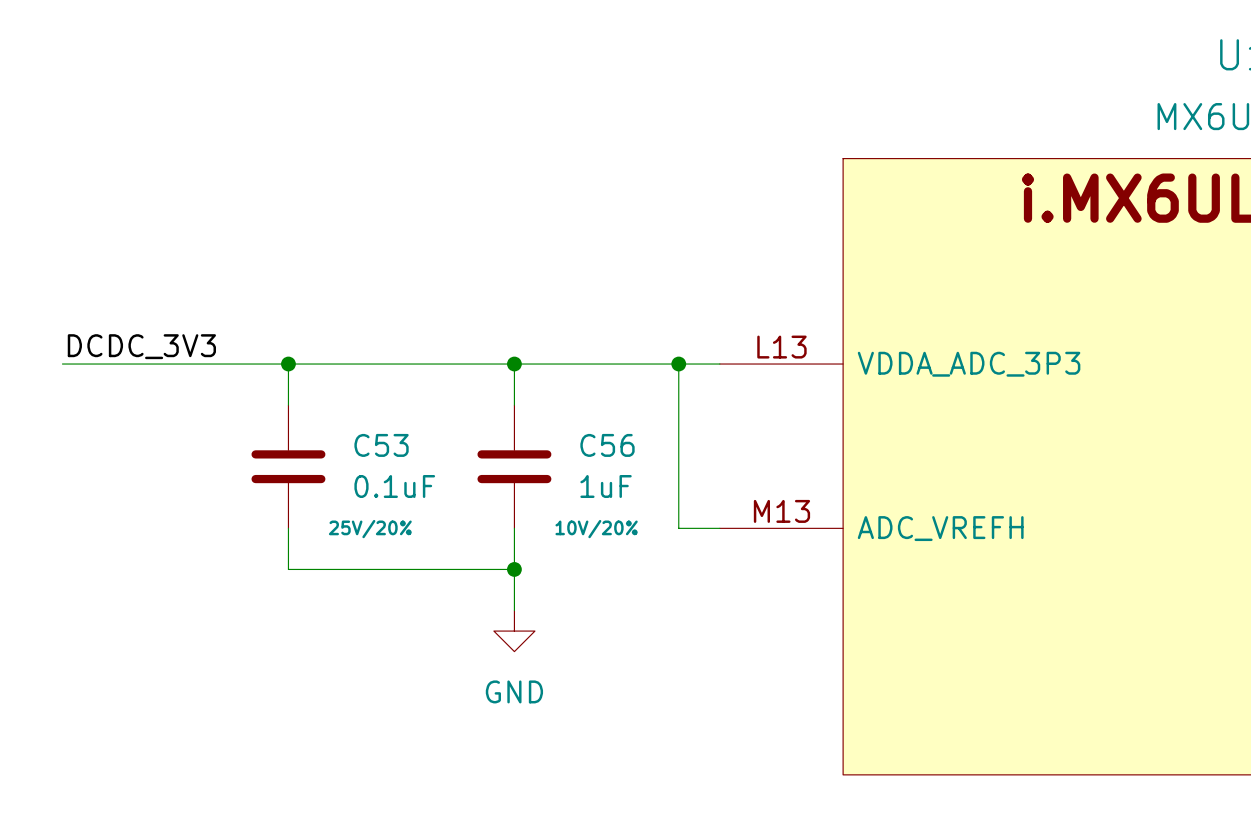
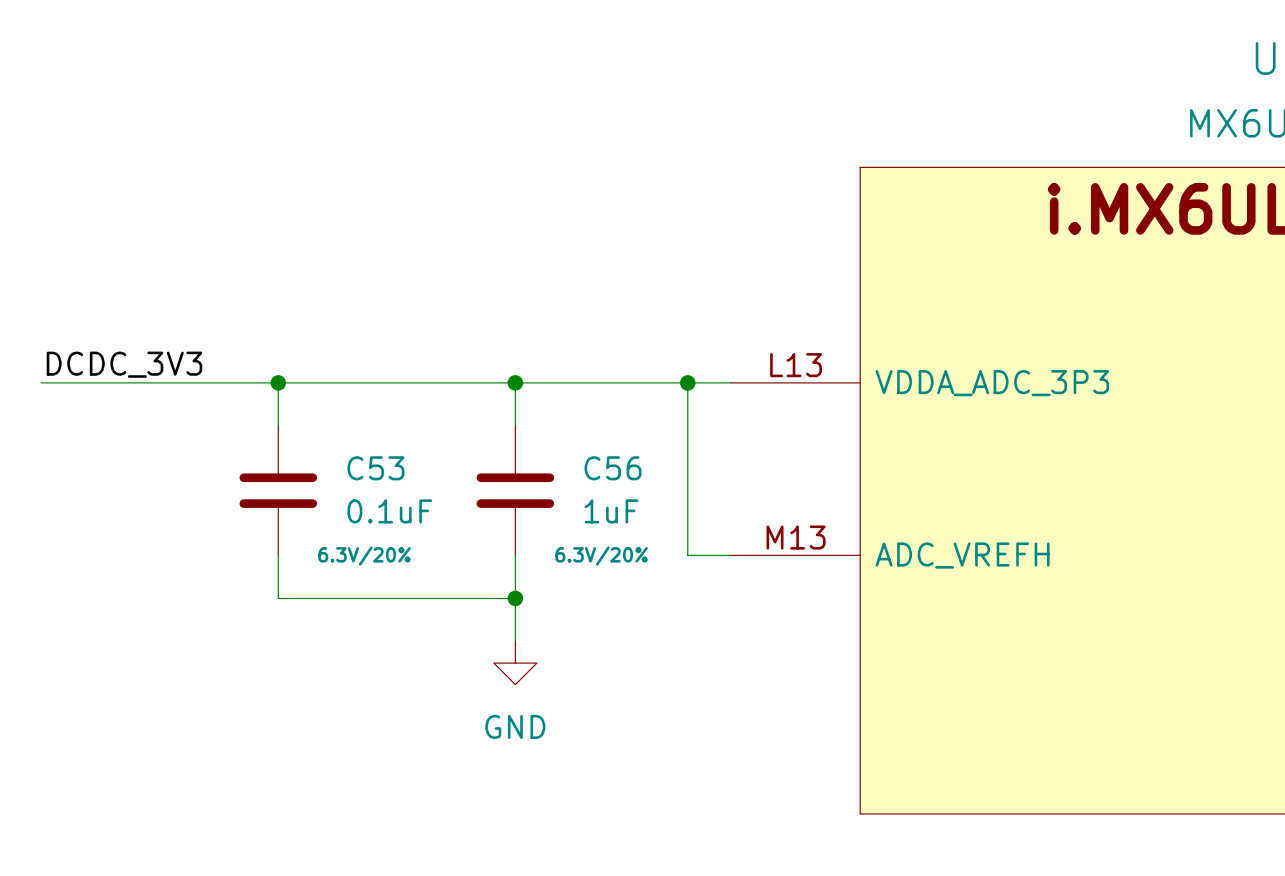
C53 text: 25V/20% (370, 529) -> 6.3V/20% (364, 556)
C56 text: 10V/20% (596, 529) -> 6.3V/20% (601, 556)

